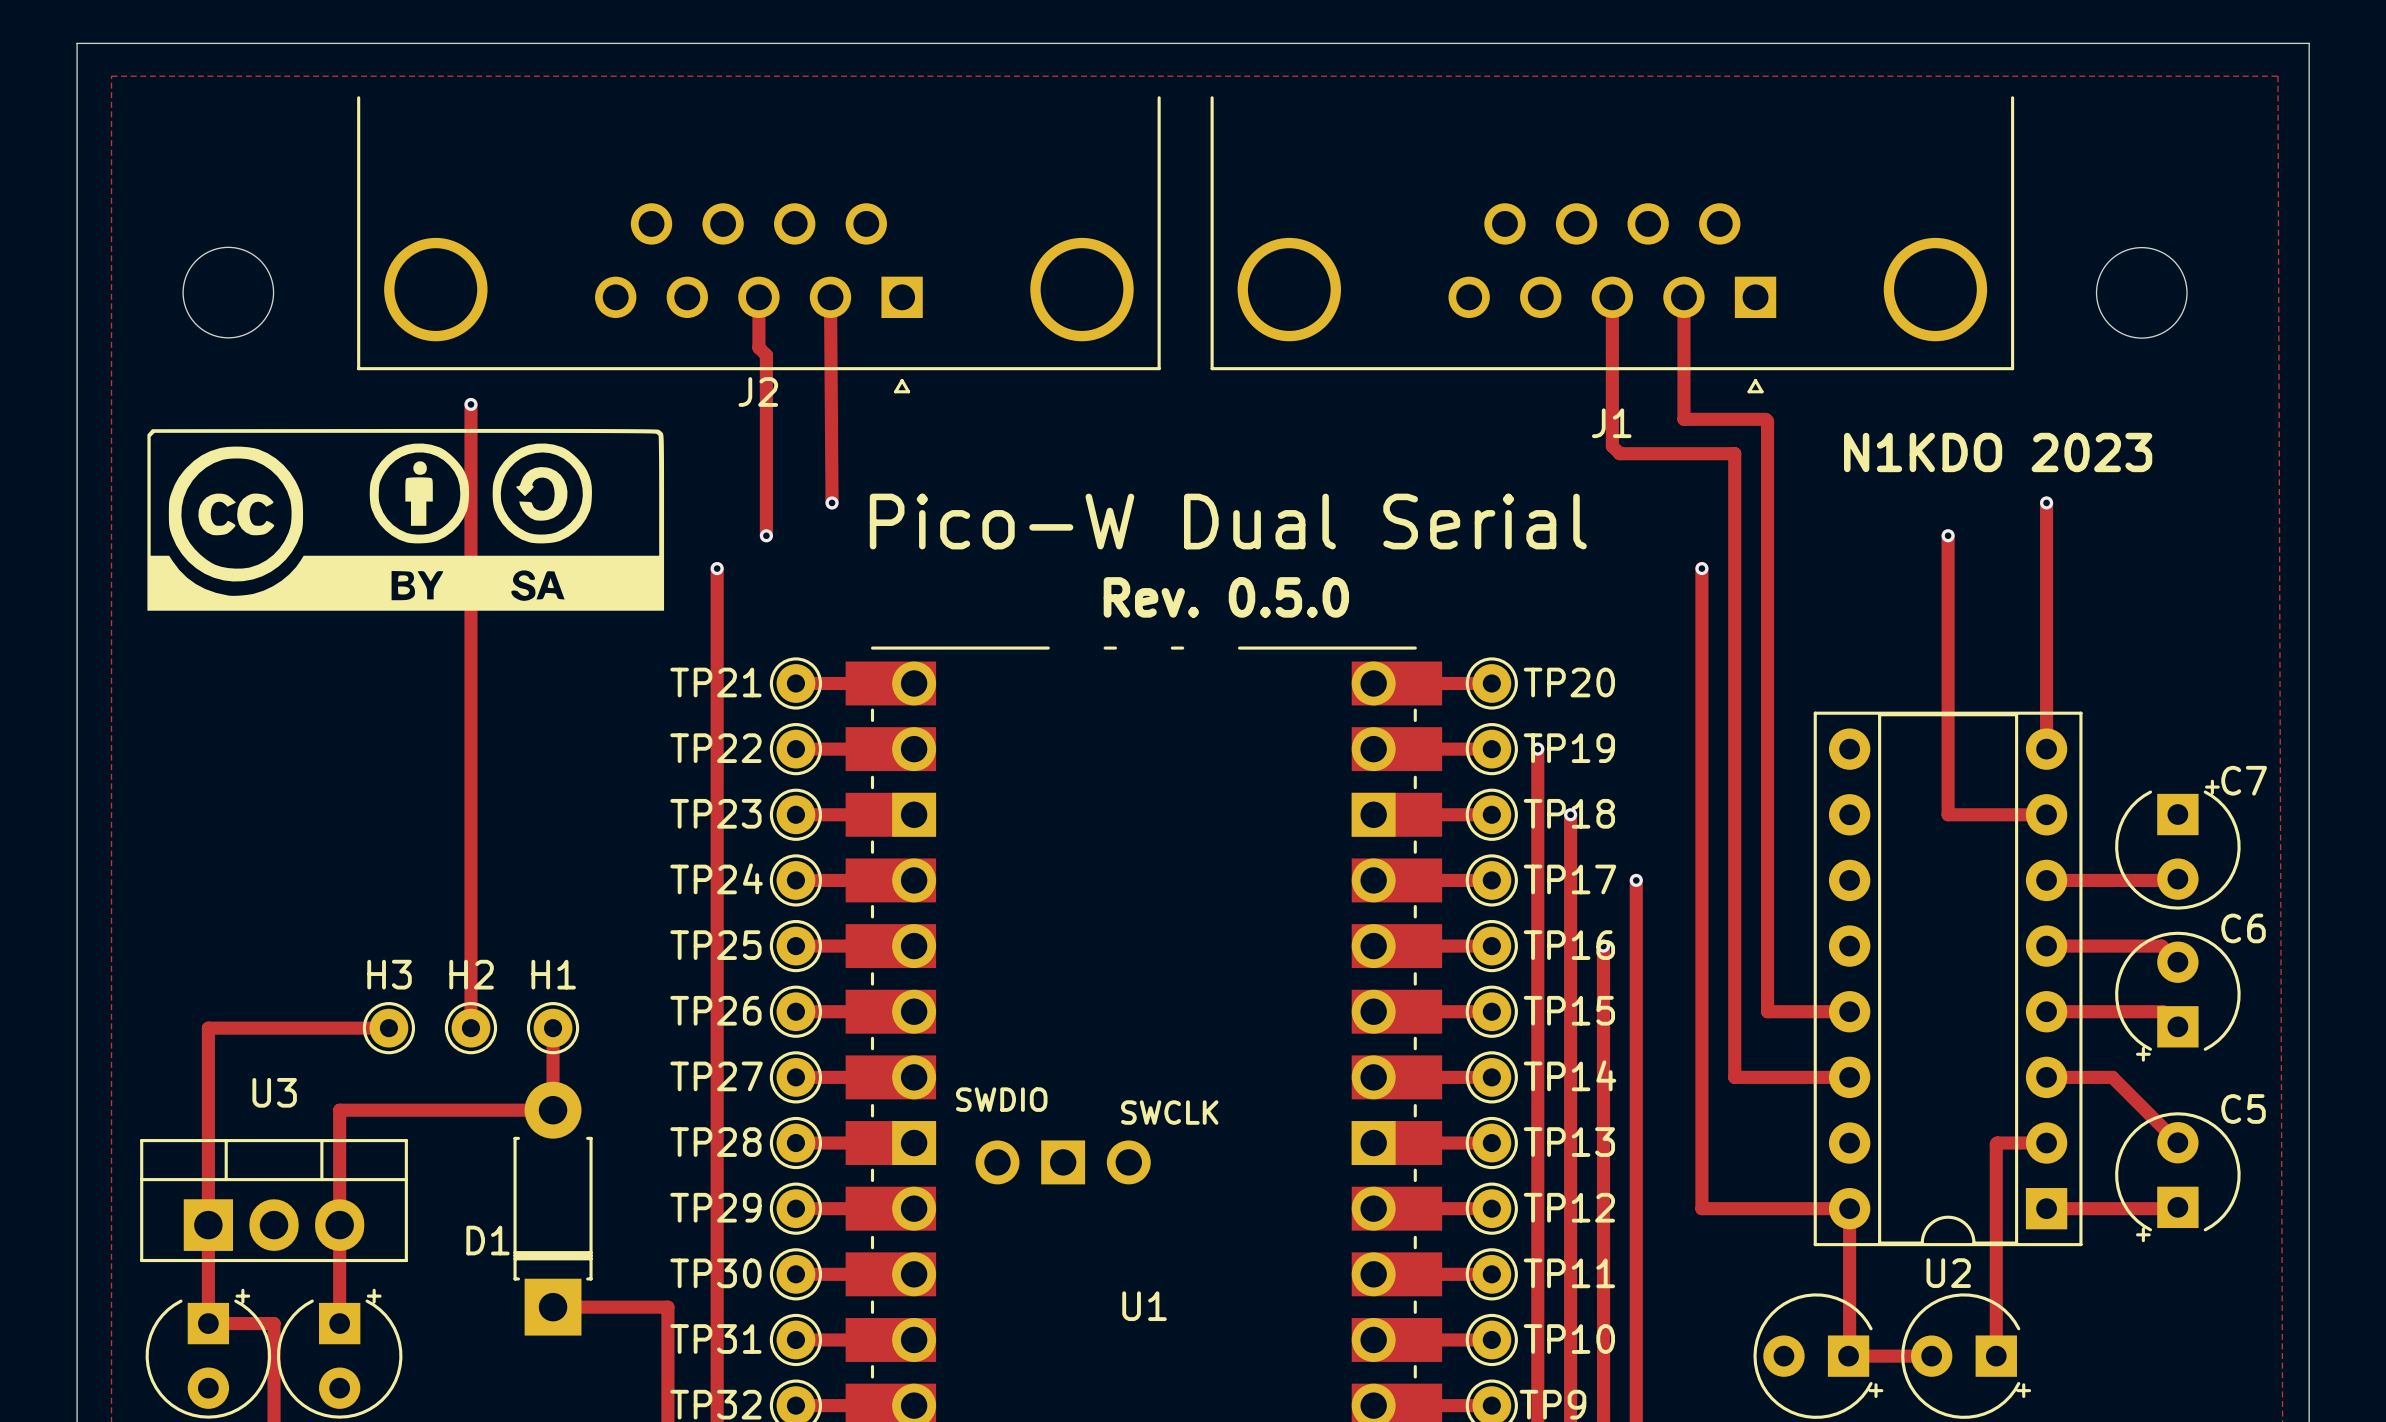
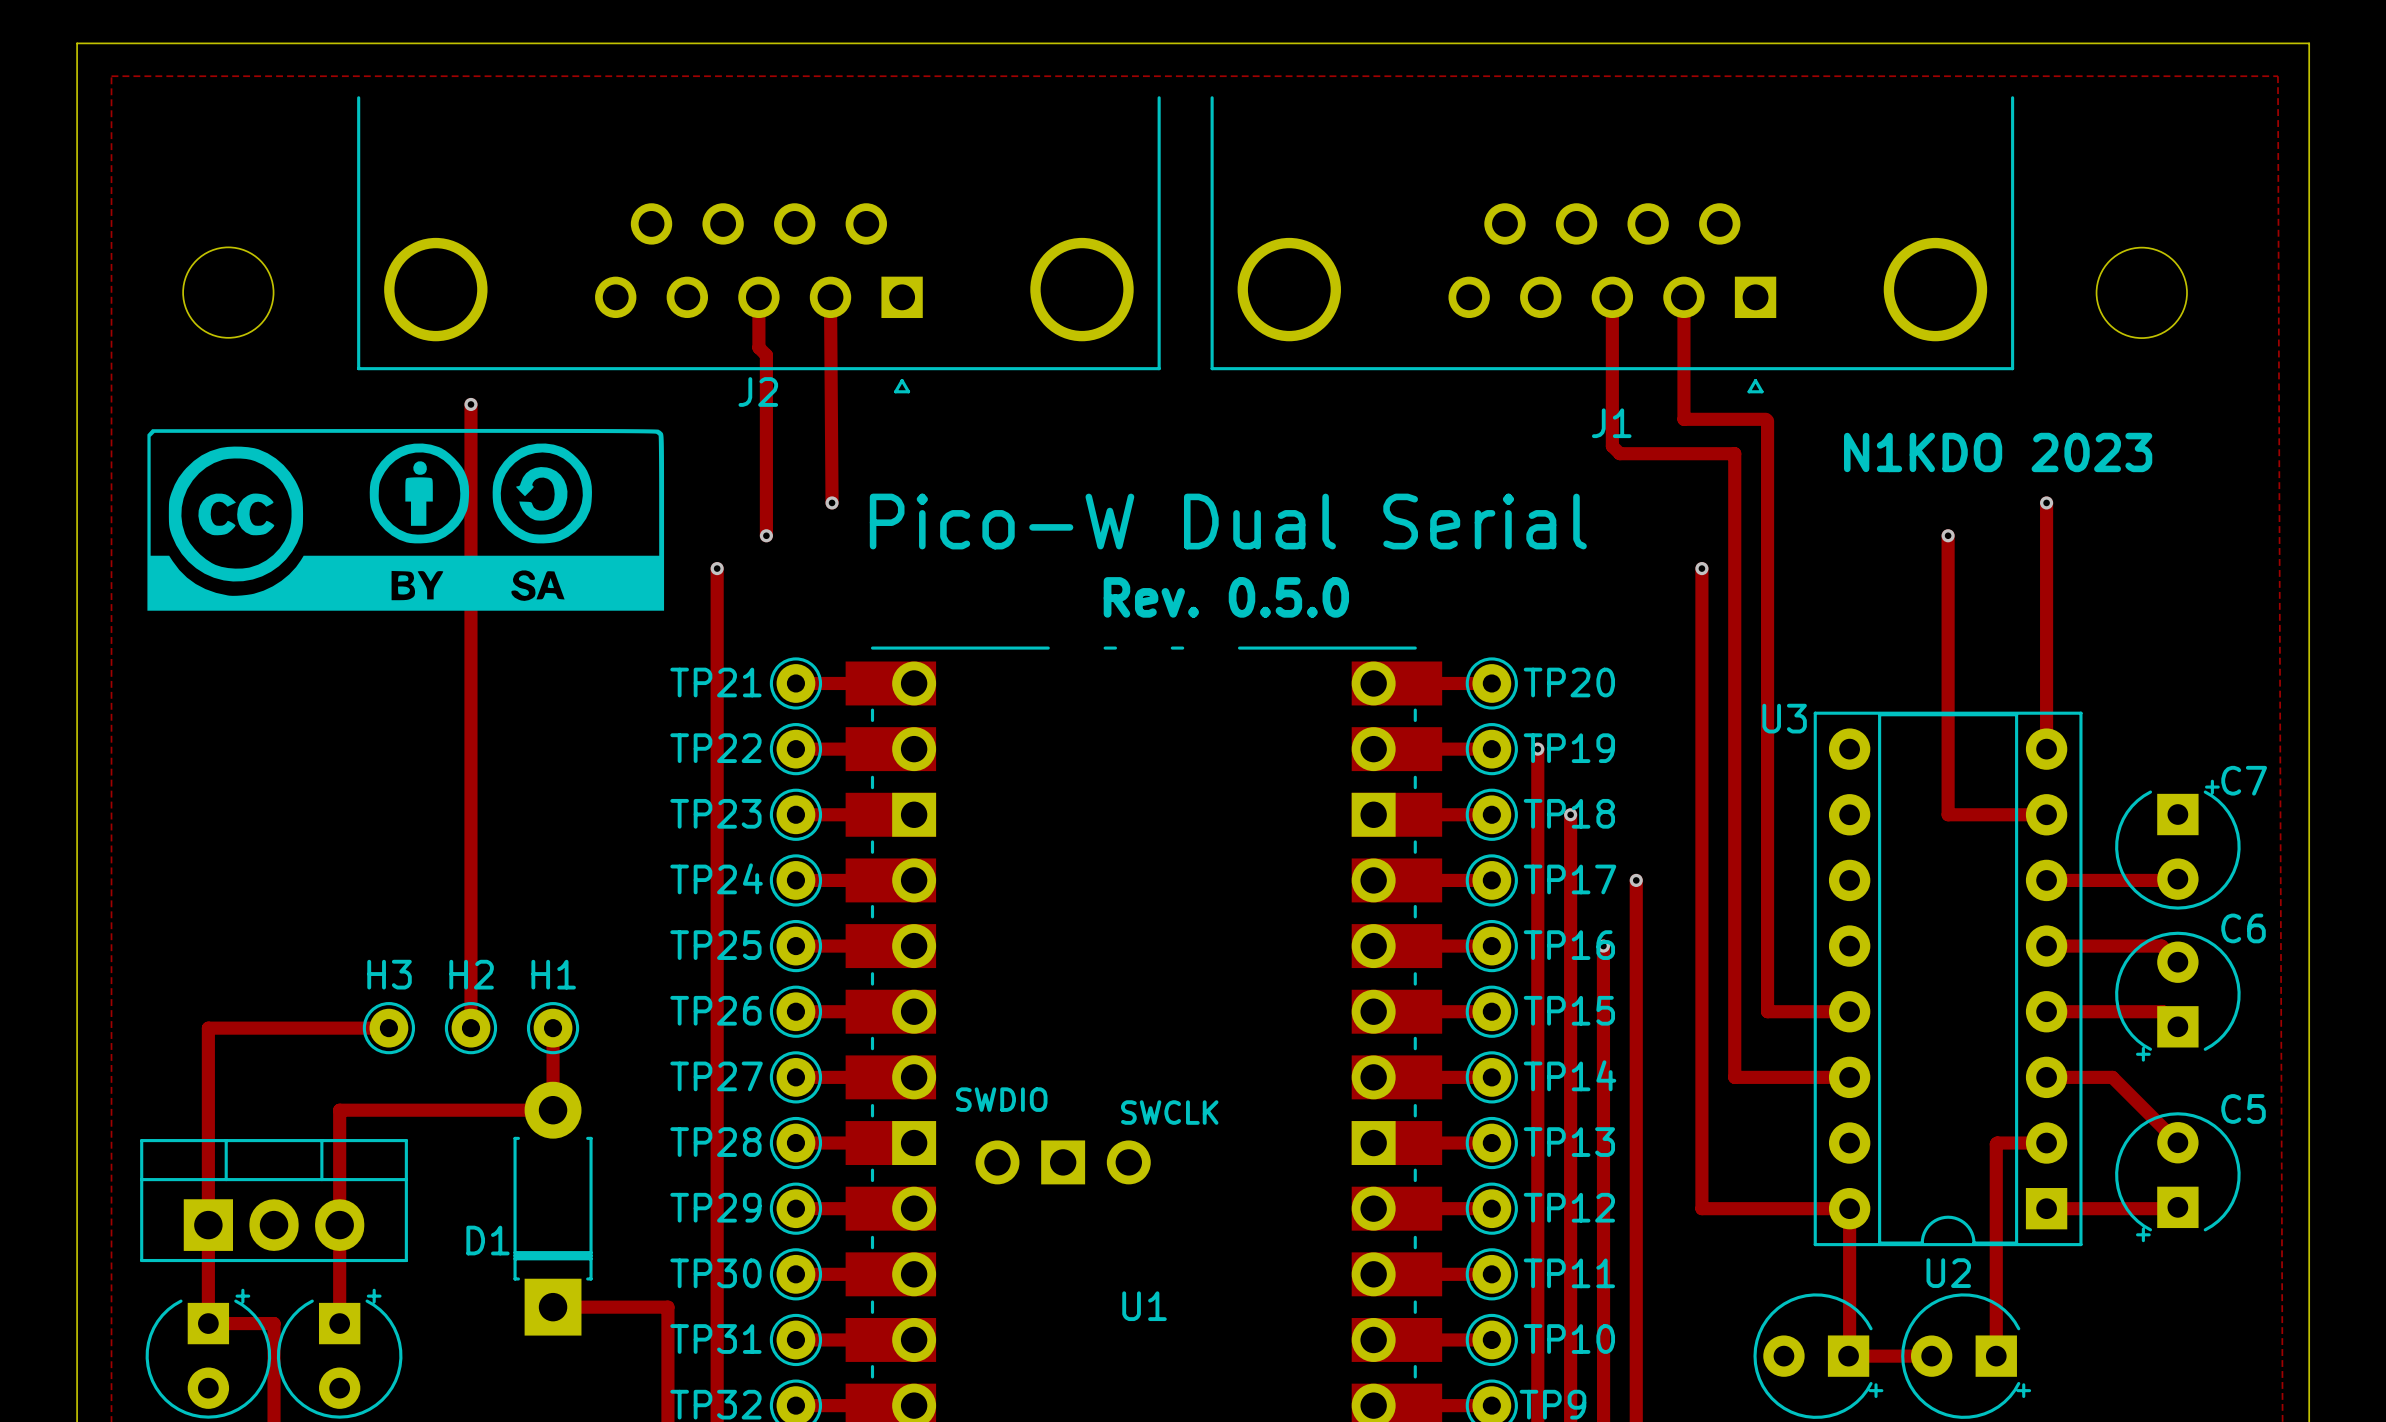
U3 name position: U3 (274, 1092) -> U3 (1784, 718)

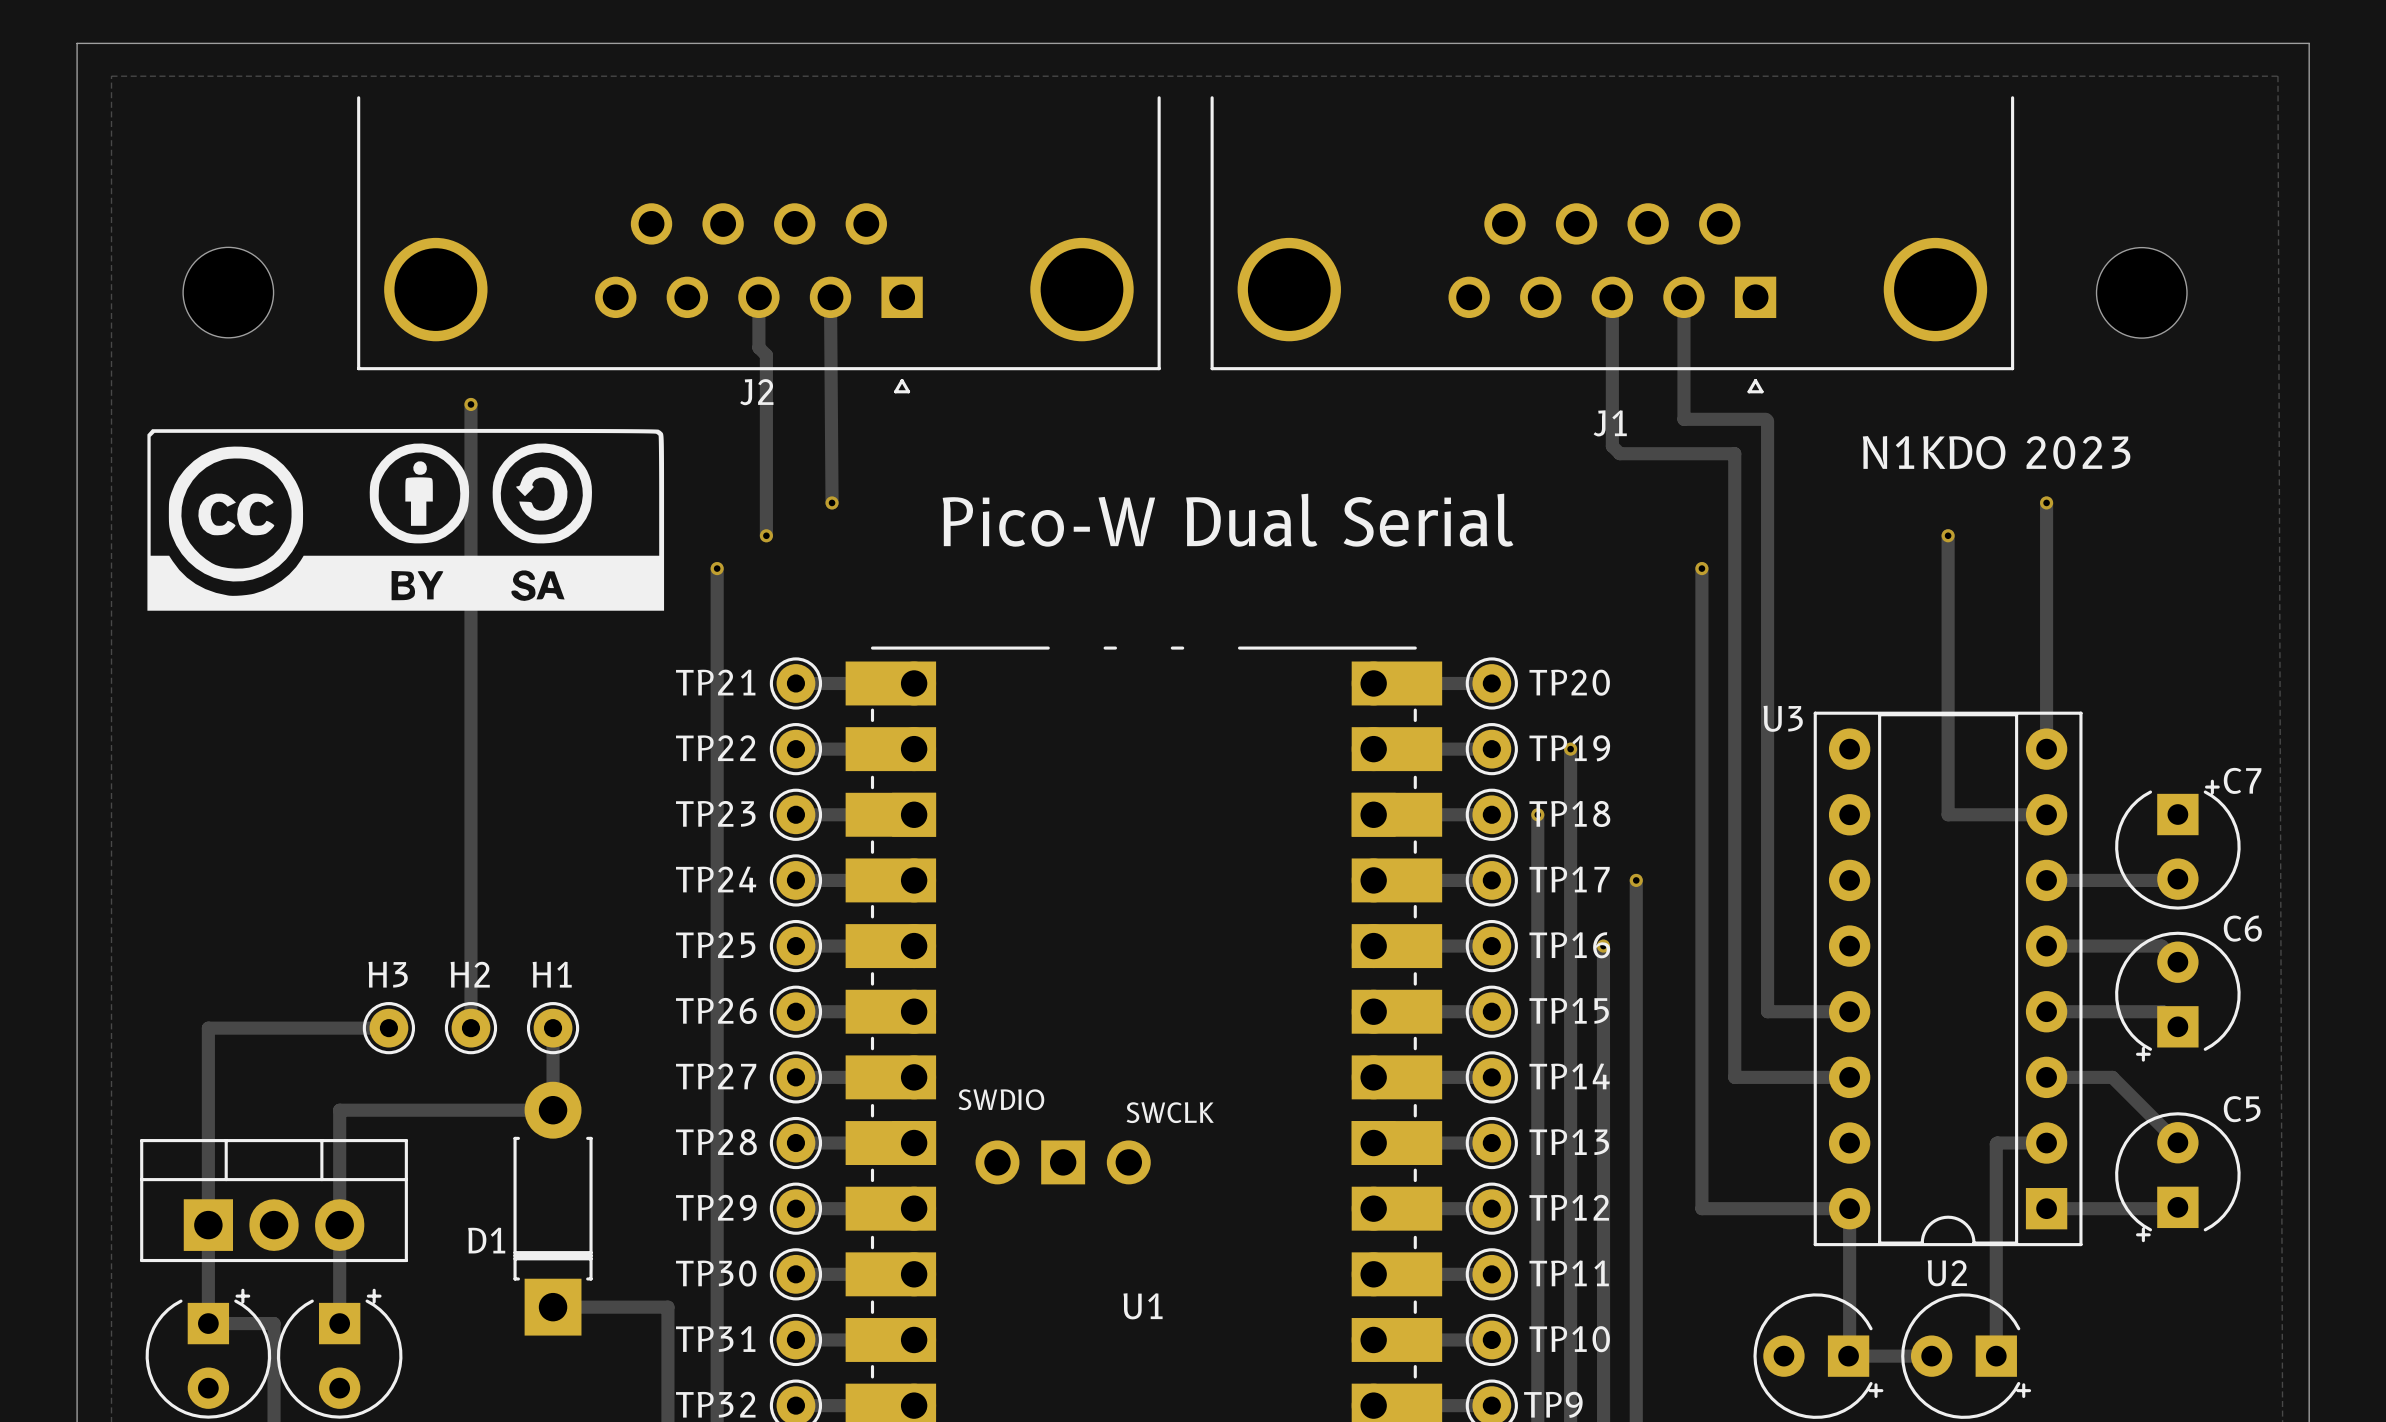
text: Rev. 0.5.0 (1226, 597) -> none
track: (1537, 749) (1537, 814) -> (1570, 749) (1570, 814)
via: (1537, 749) -> none
via: none -> (1570, 749)
via: none -> (1537, 814)
via: (1570, 814) -> none

